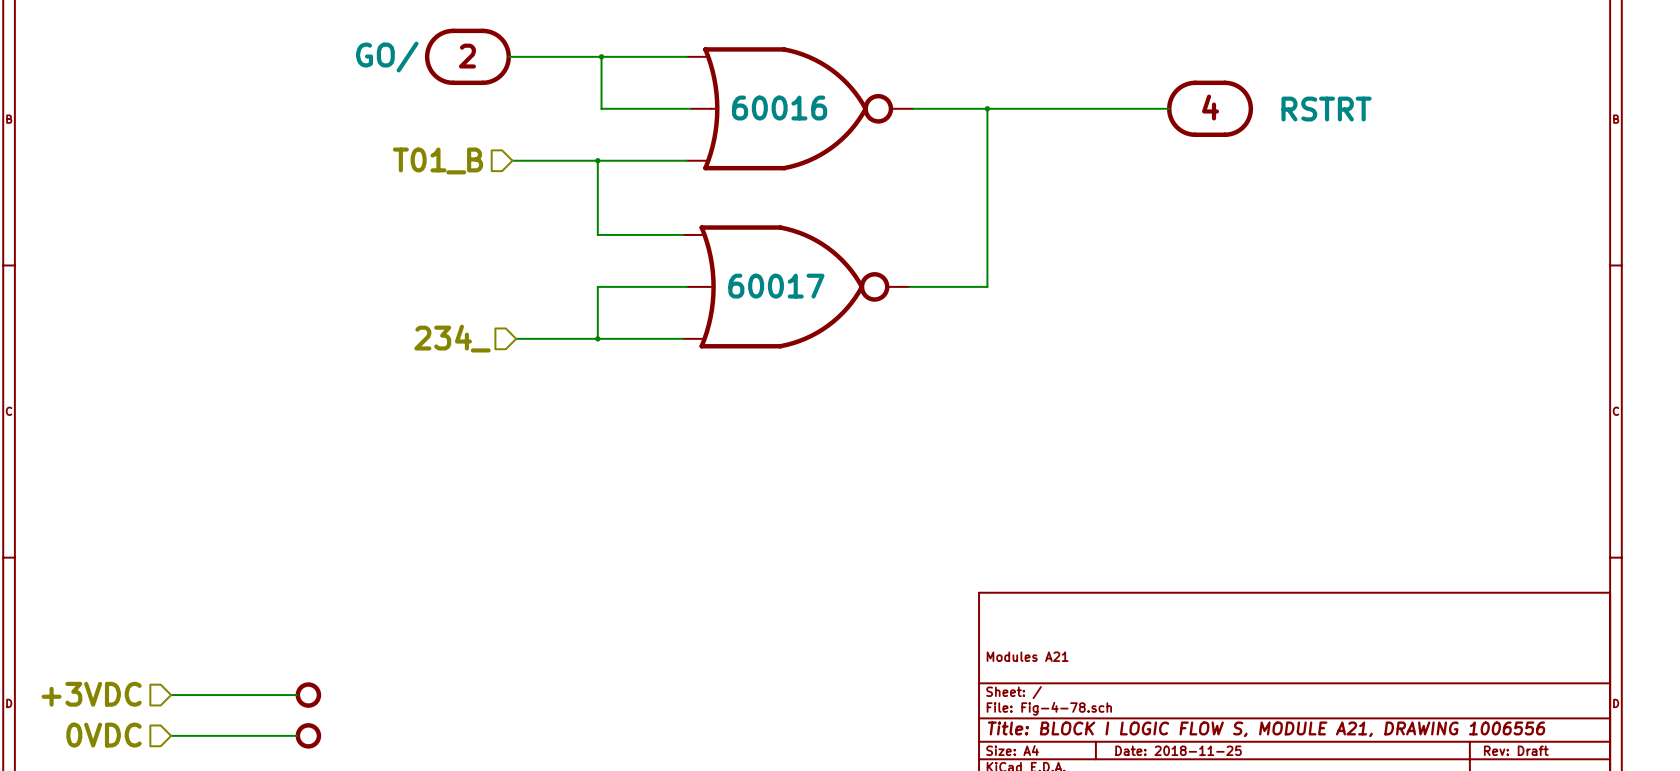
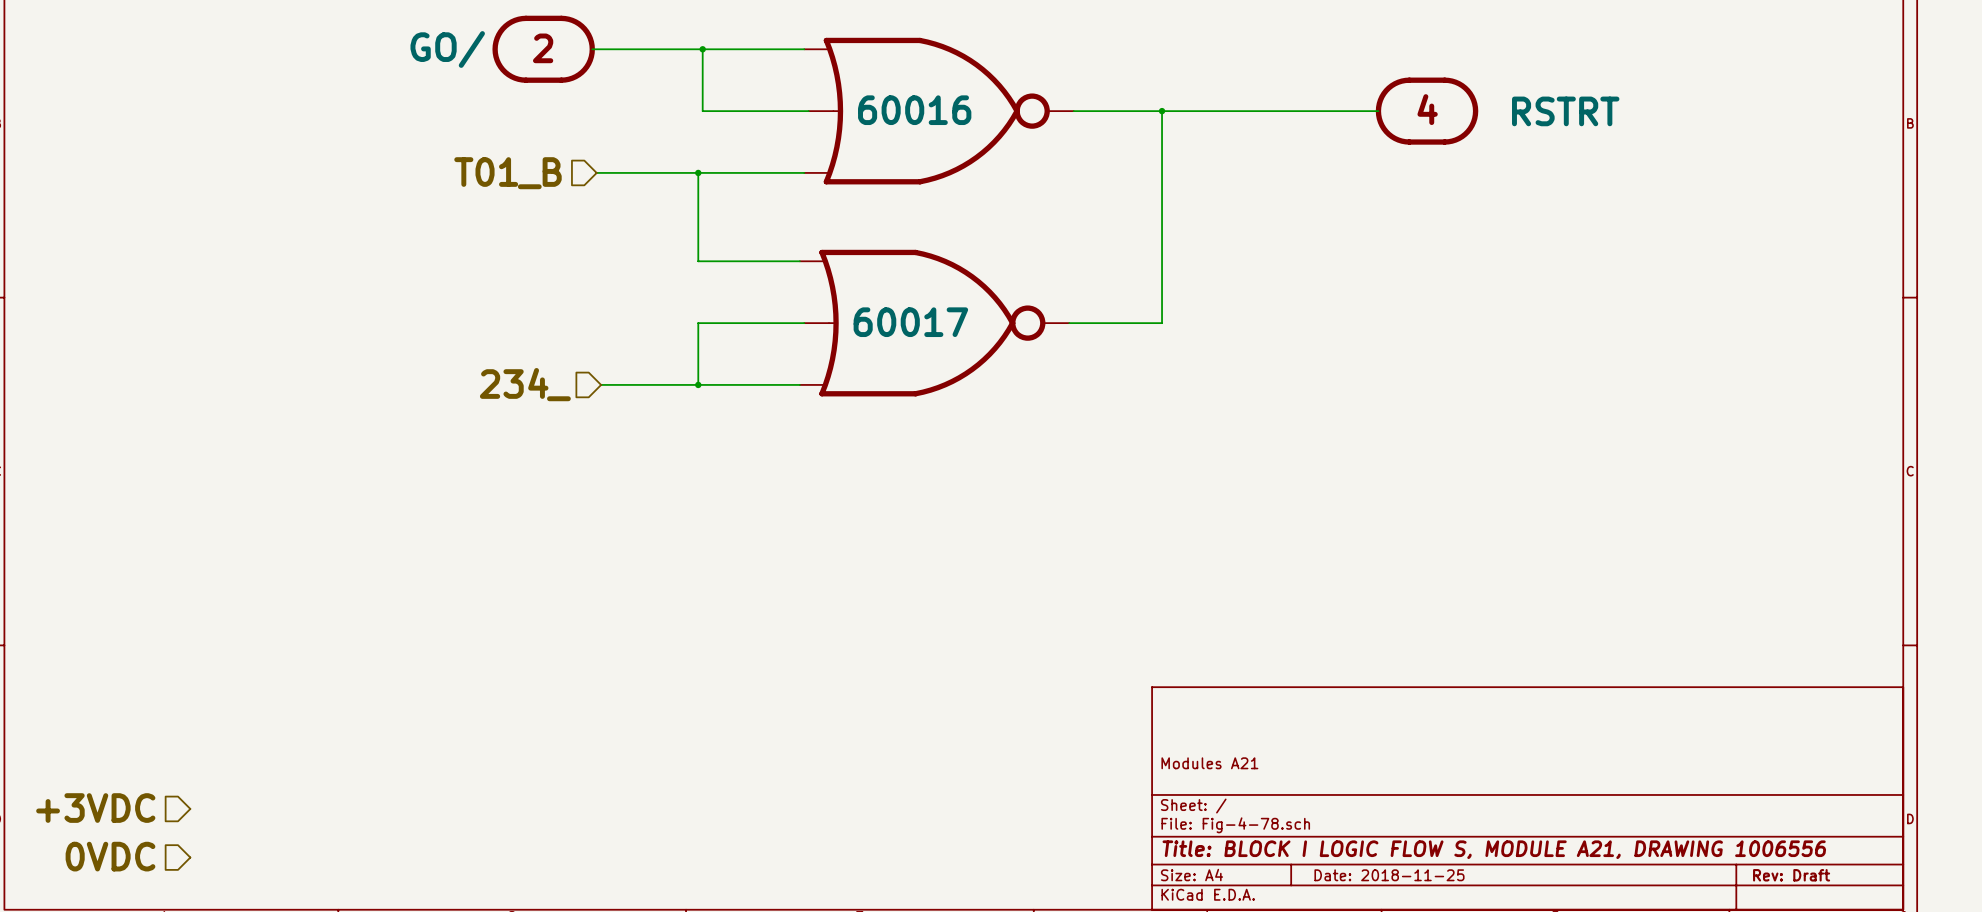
wire: (171, 695) (297, 695) -> none
part: (308, 695) -> none
wire: (171, 735) (297, 735) -> none
part: (308, 735) -> none

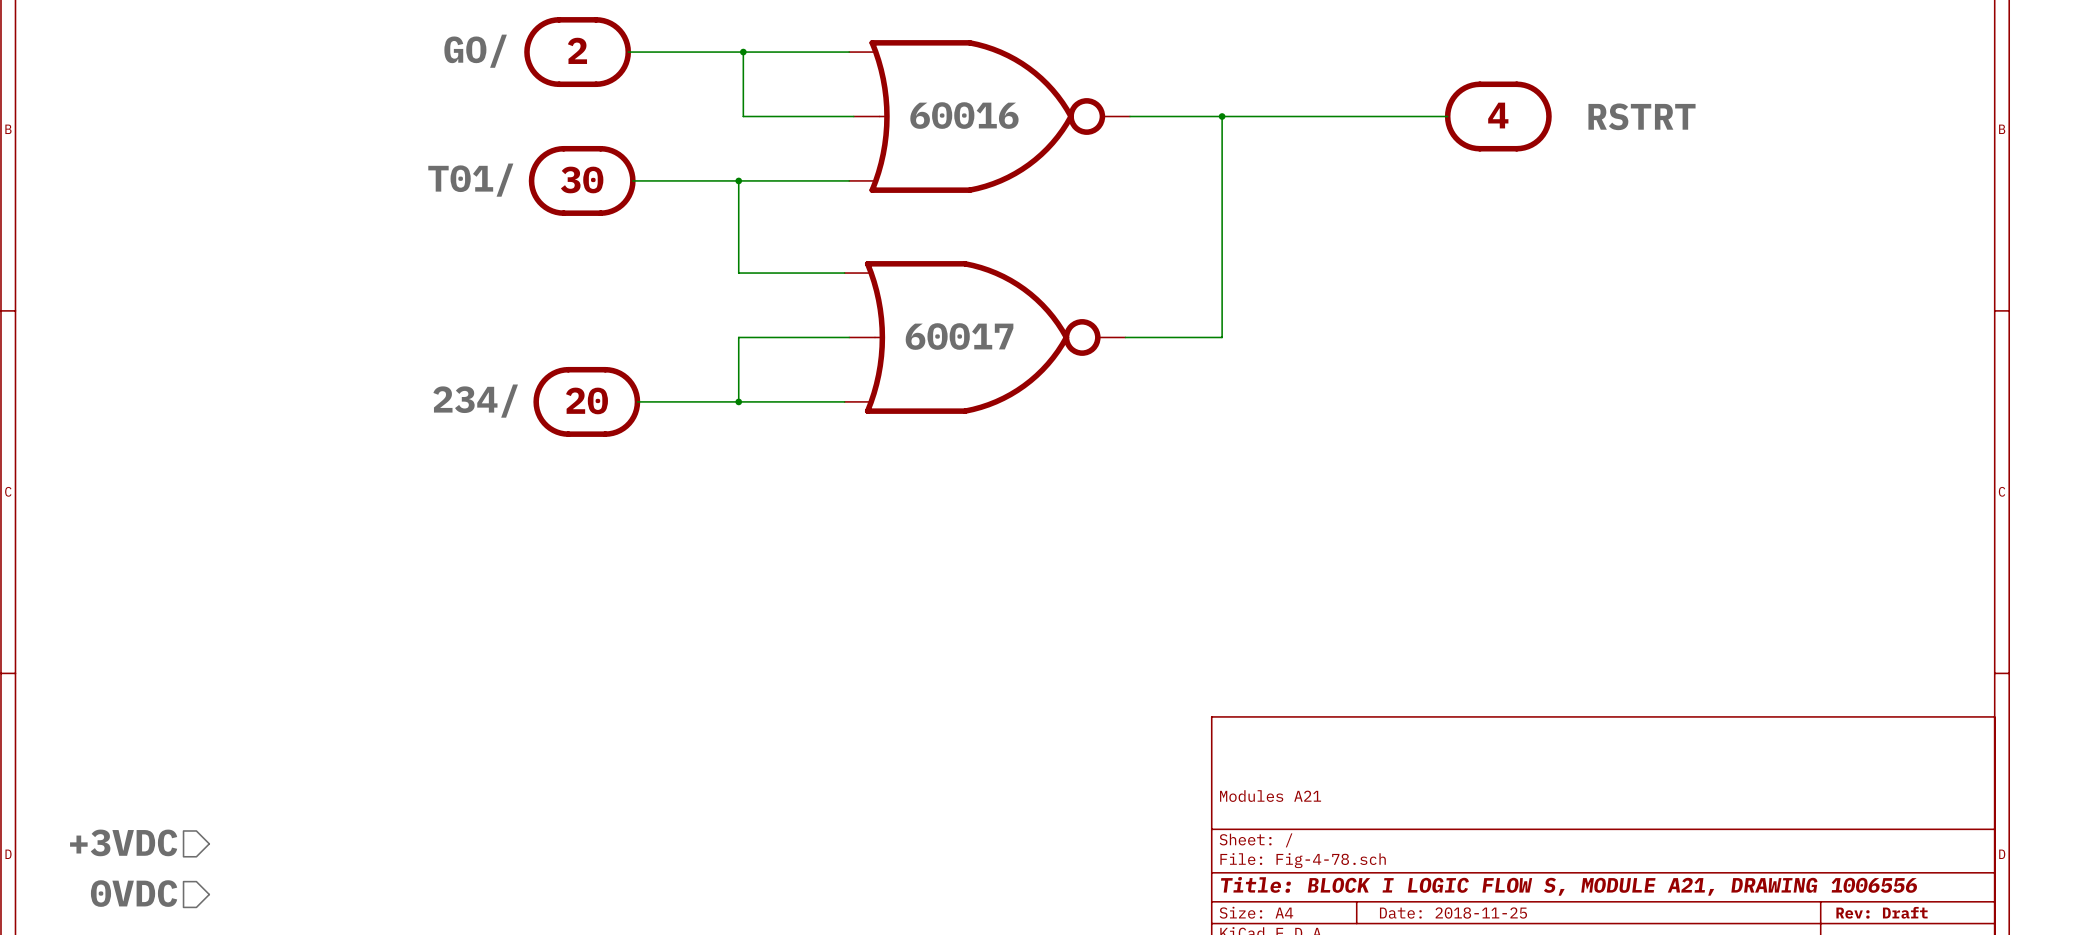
part: none -> (582, 180)
hierarchical label: T01_B (507, 173) -> none
hierarchical label: 234_ (525, 384) -> none
part: none -> (586, 401)

